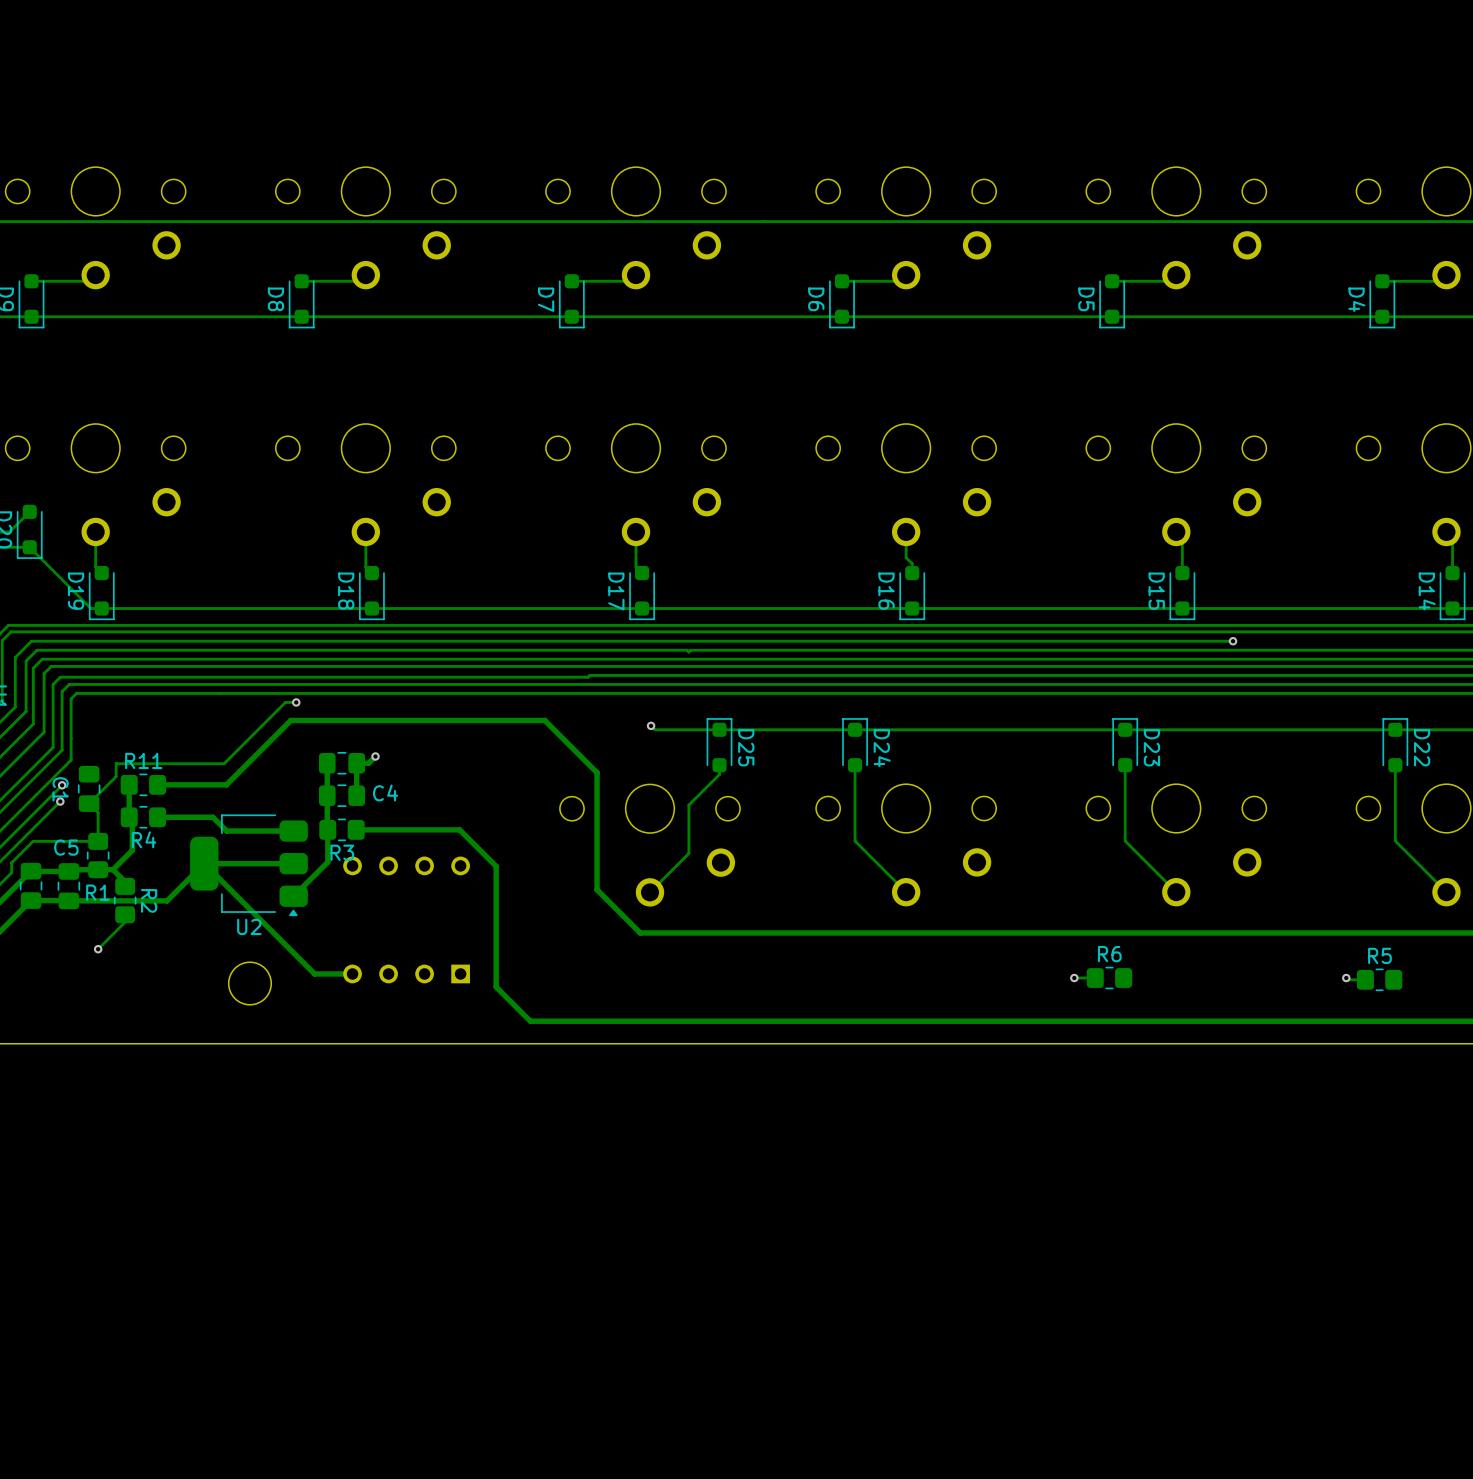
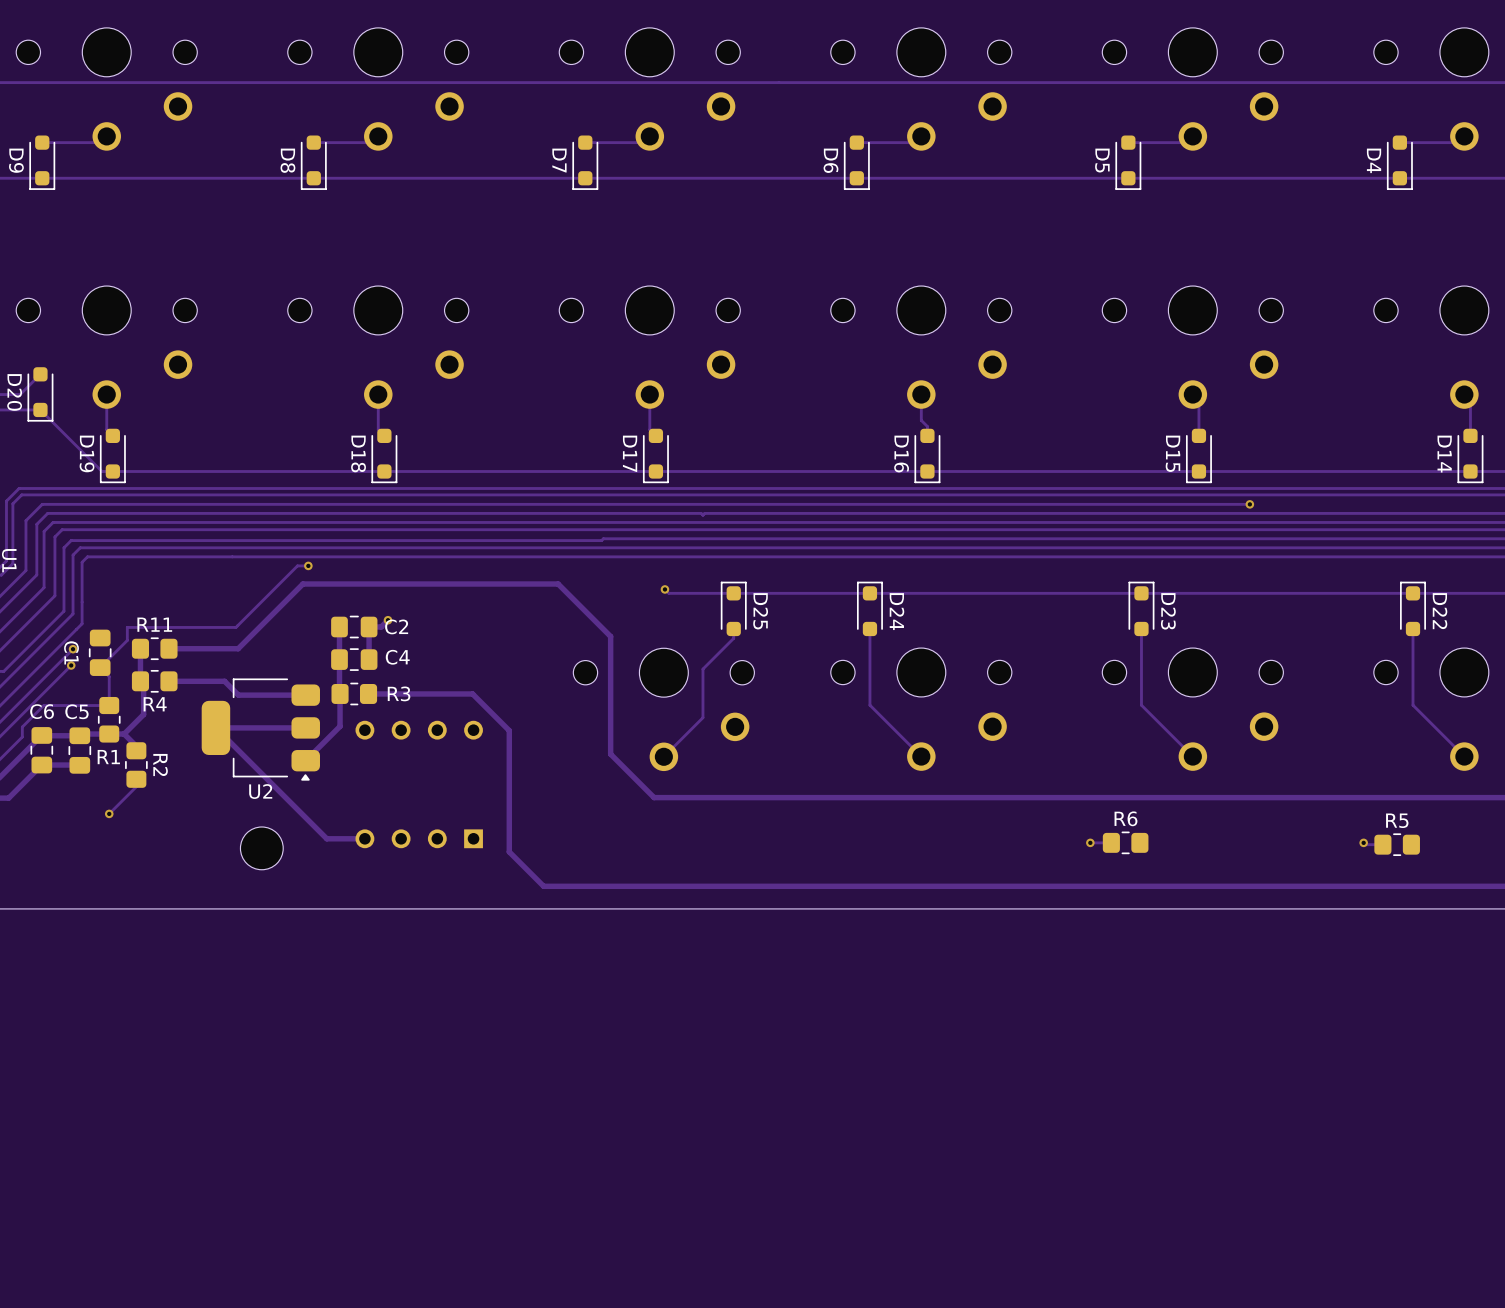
C2 name: none -> C2 (396, 626)
C6 name: none -> C6 (42, 711)
R3 name position: R3 (342, 852) -> R3 (399, 693)
track: (204, 863) (167, 900) (68, 900) -> none

